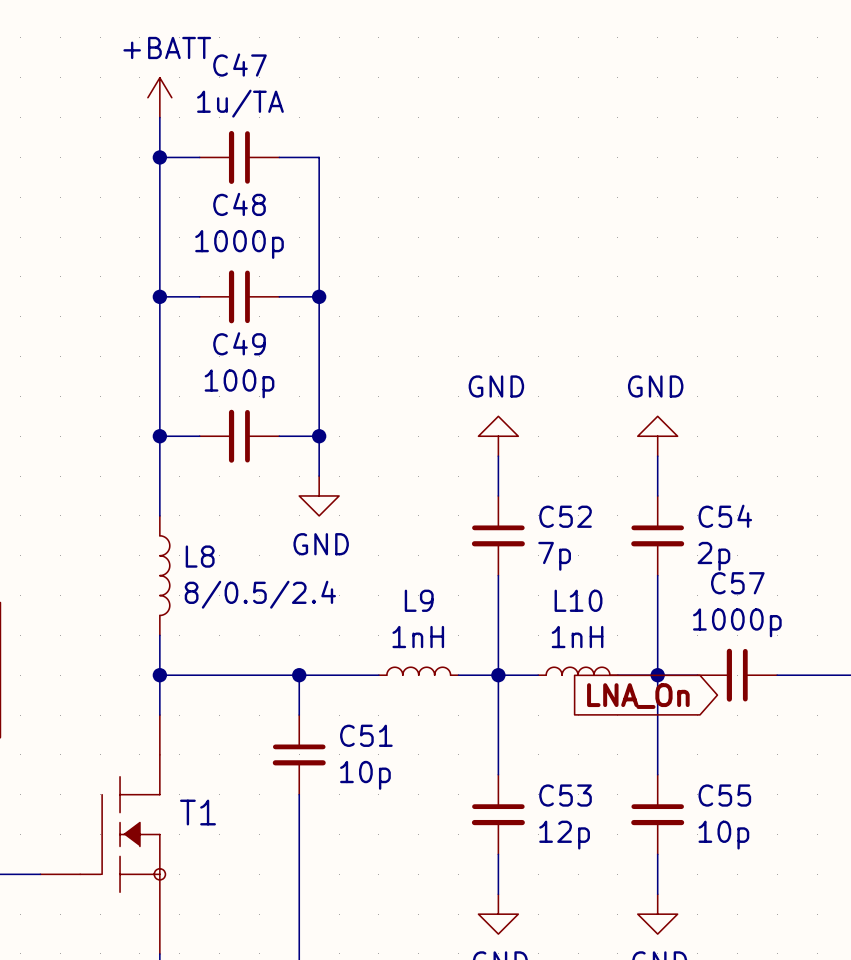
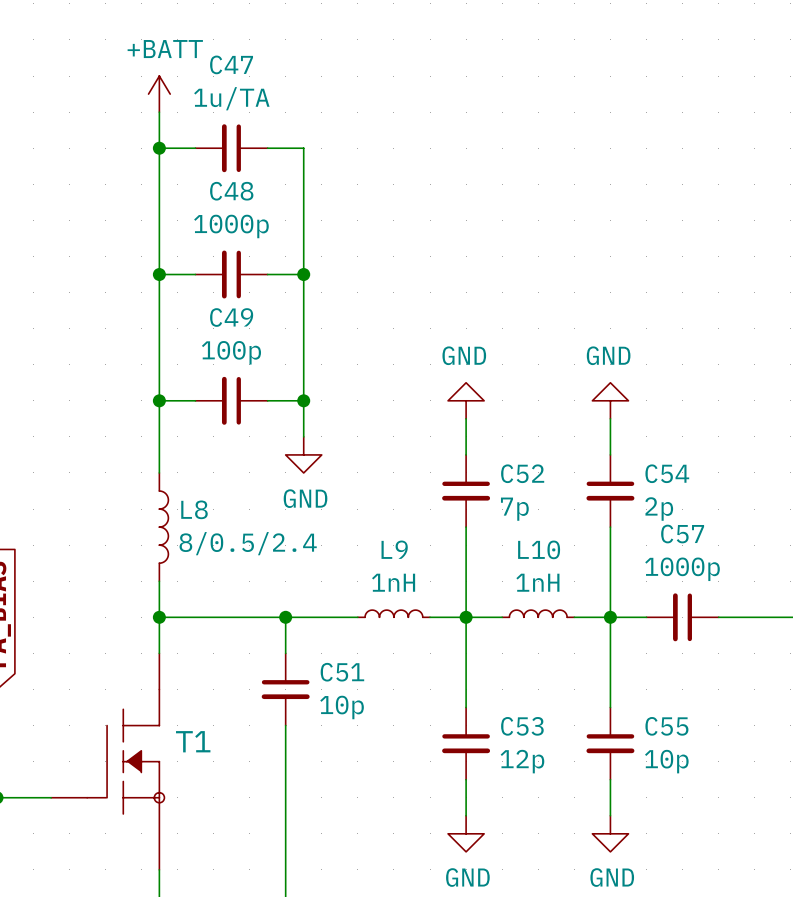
global label: LNA_On (638, 696) -> none

